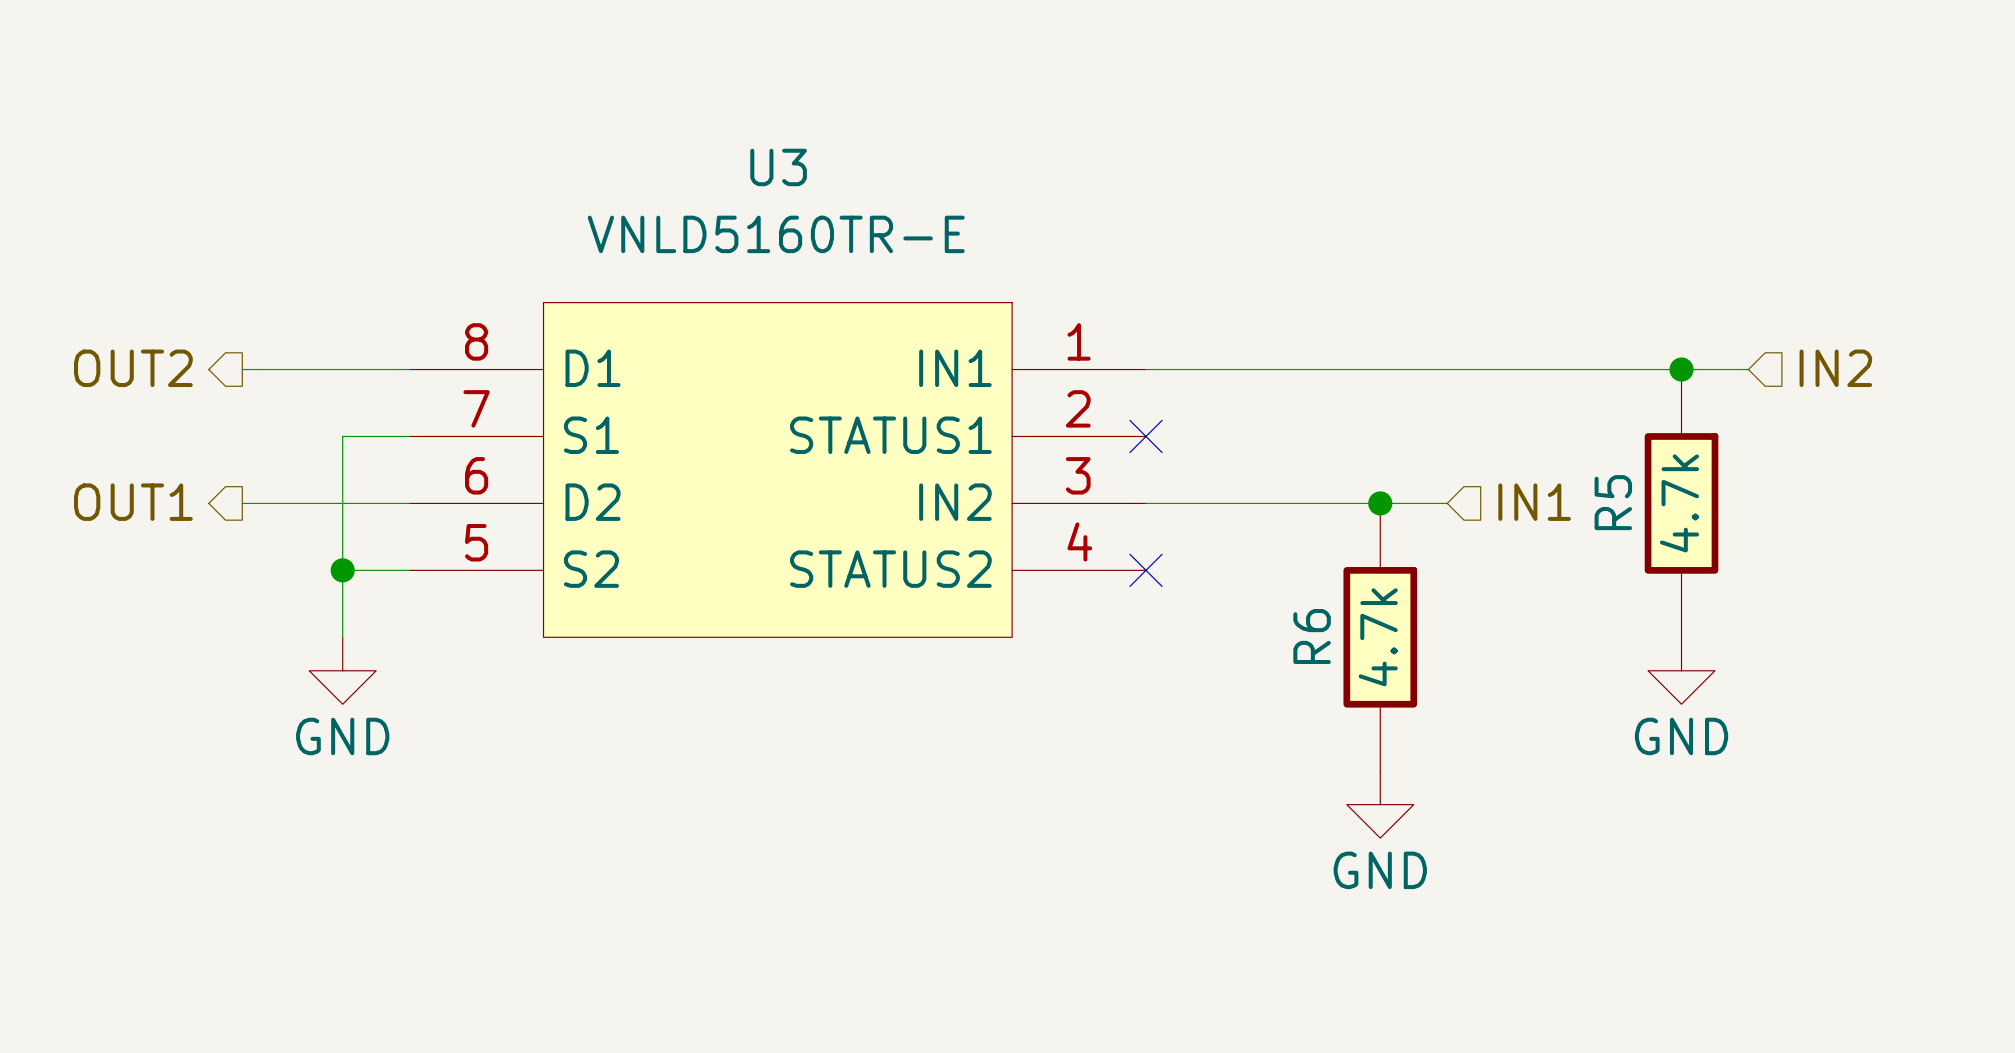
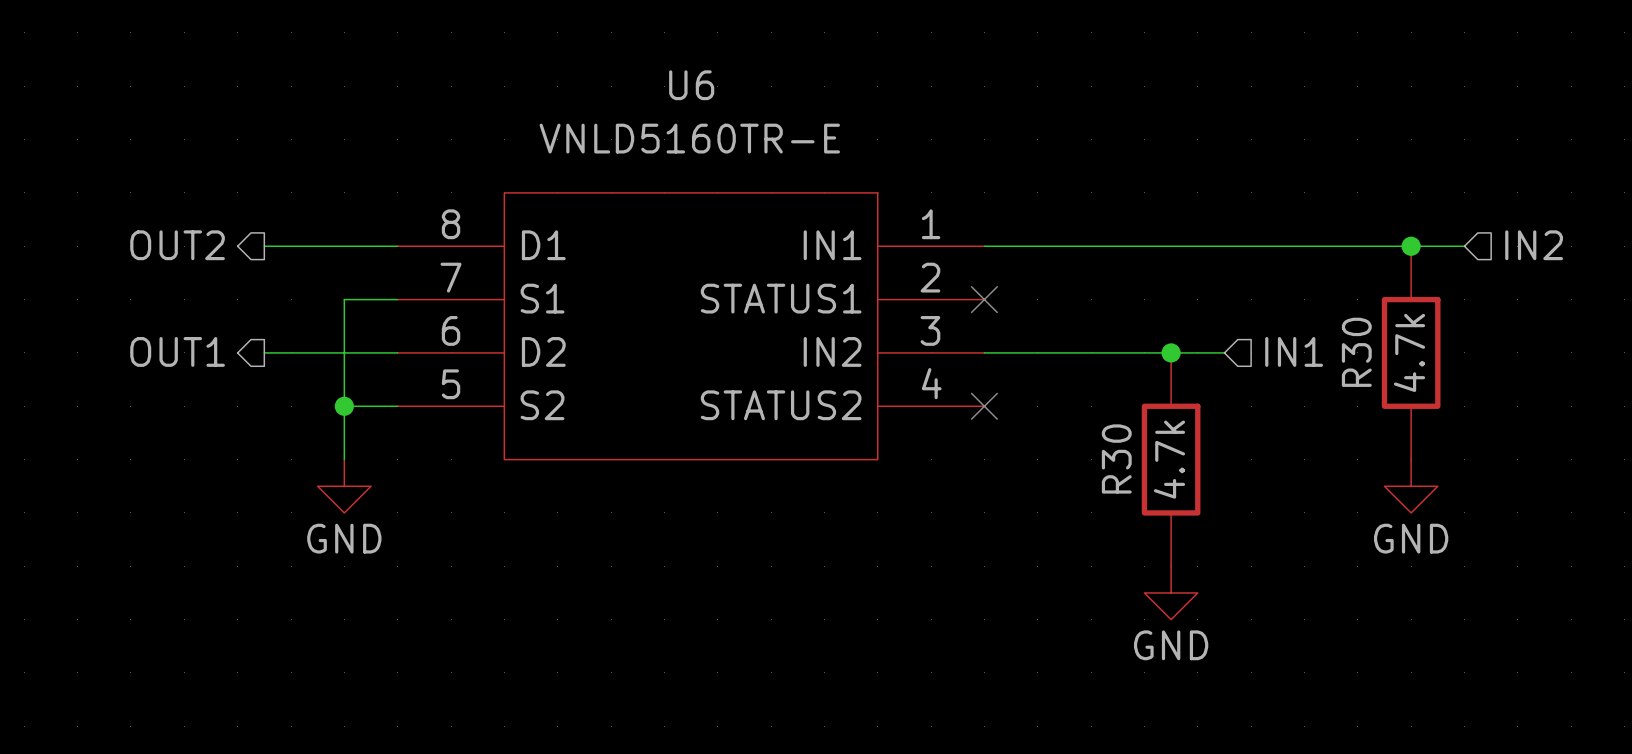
U3 name: U3 (778, 167) -> U6 (691, 85)
R5 name: R5 (1613, 502) -> R30 (1356, 352)
R6 name: R6 (1312, 636) -> R30 (1116, 458)

